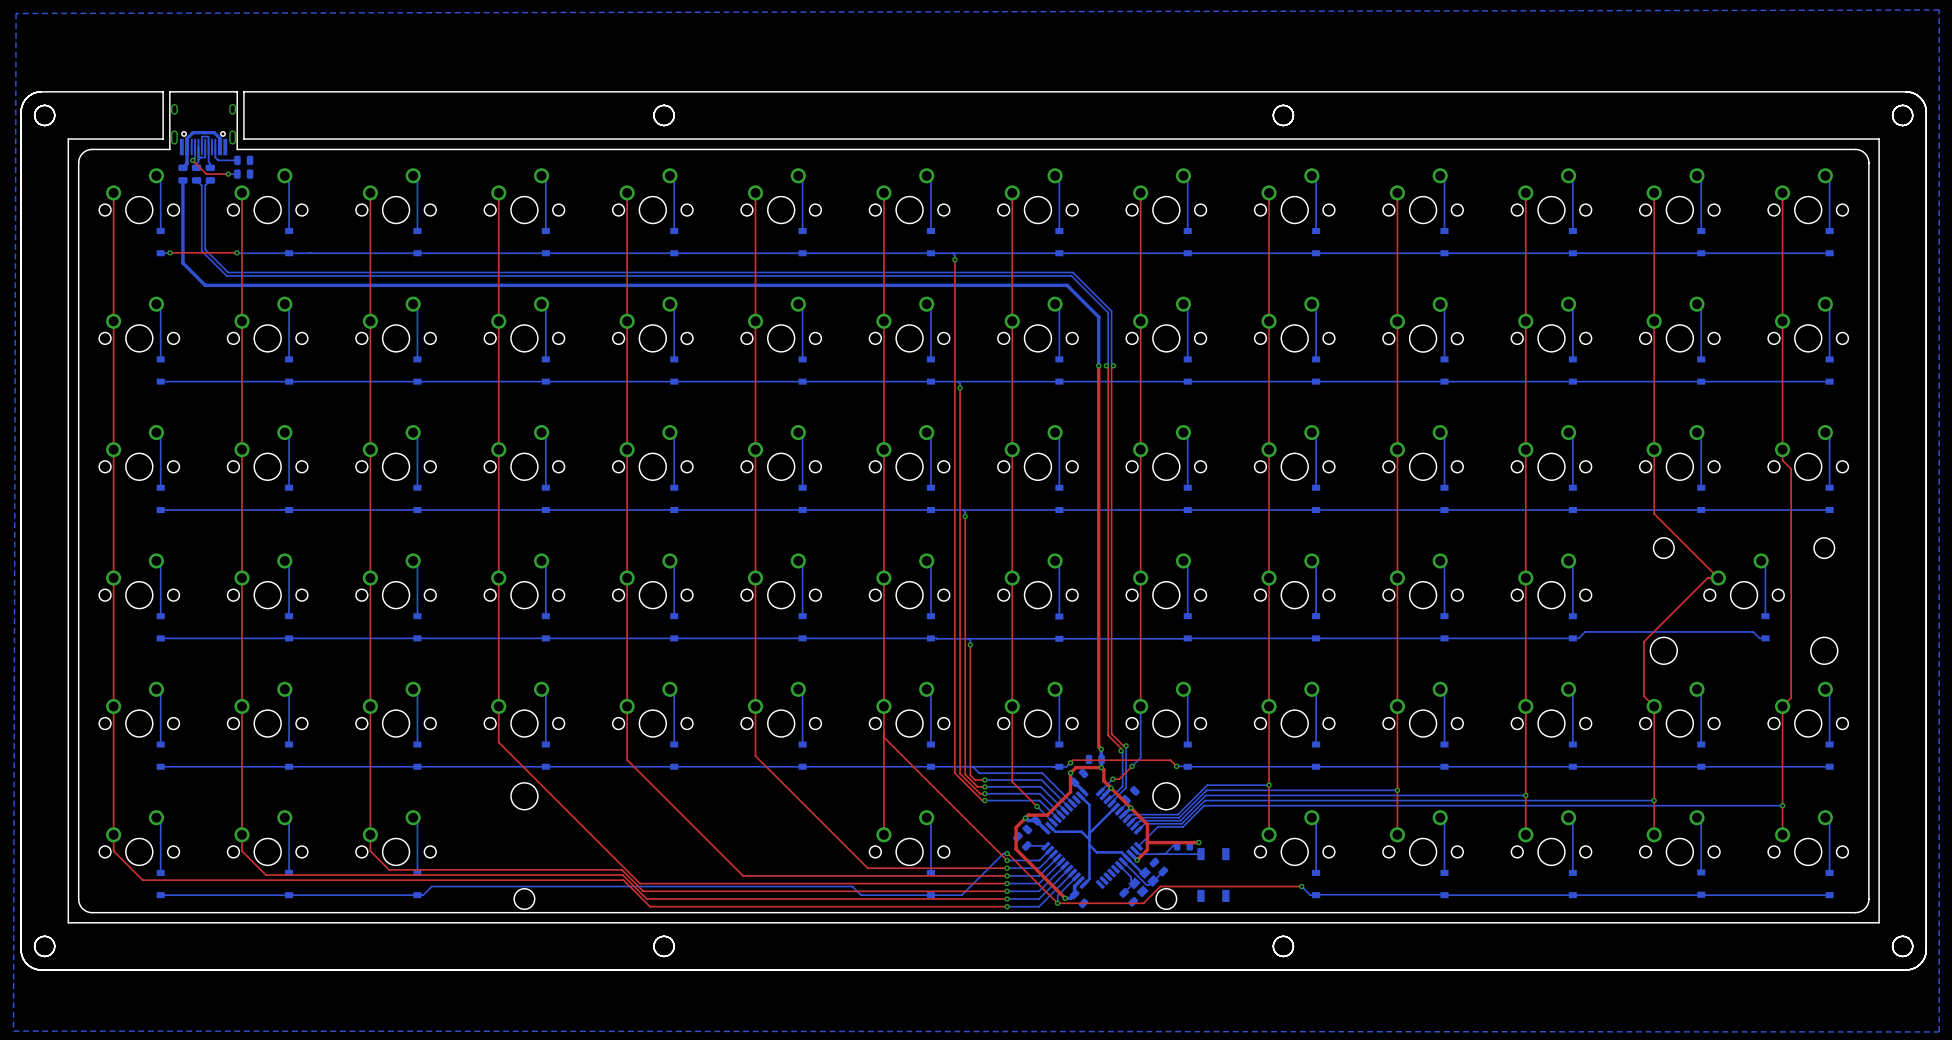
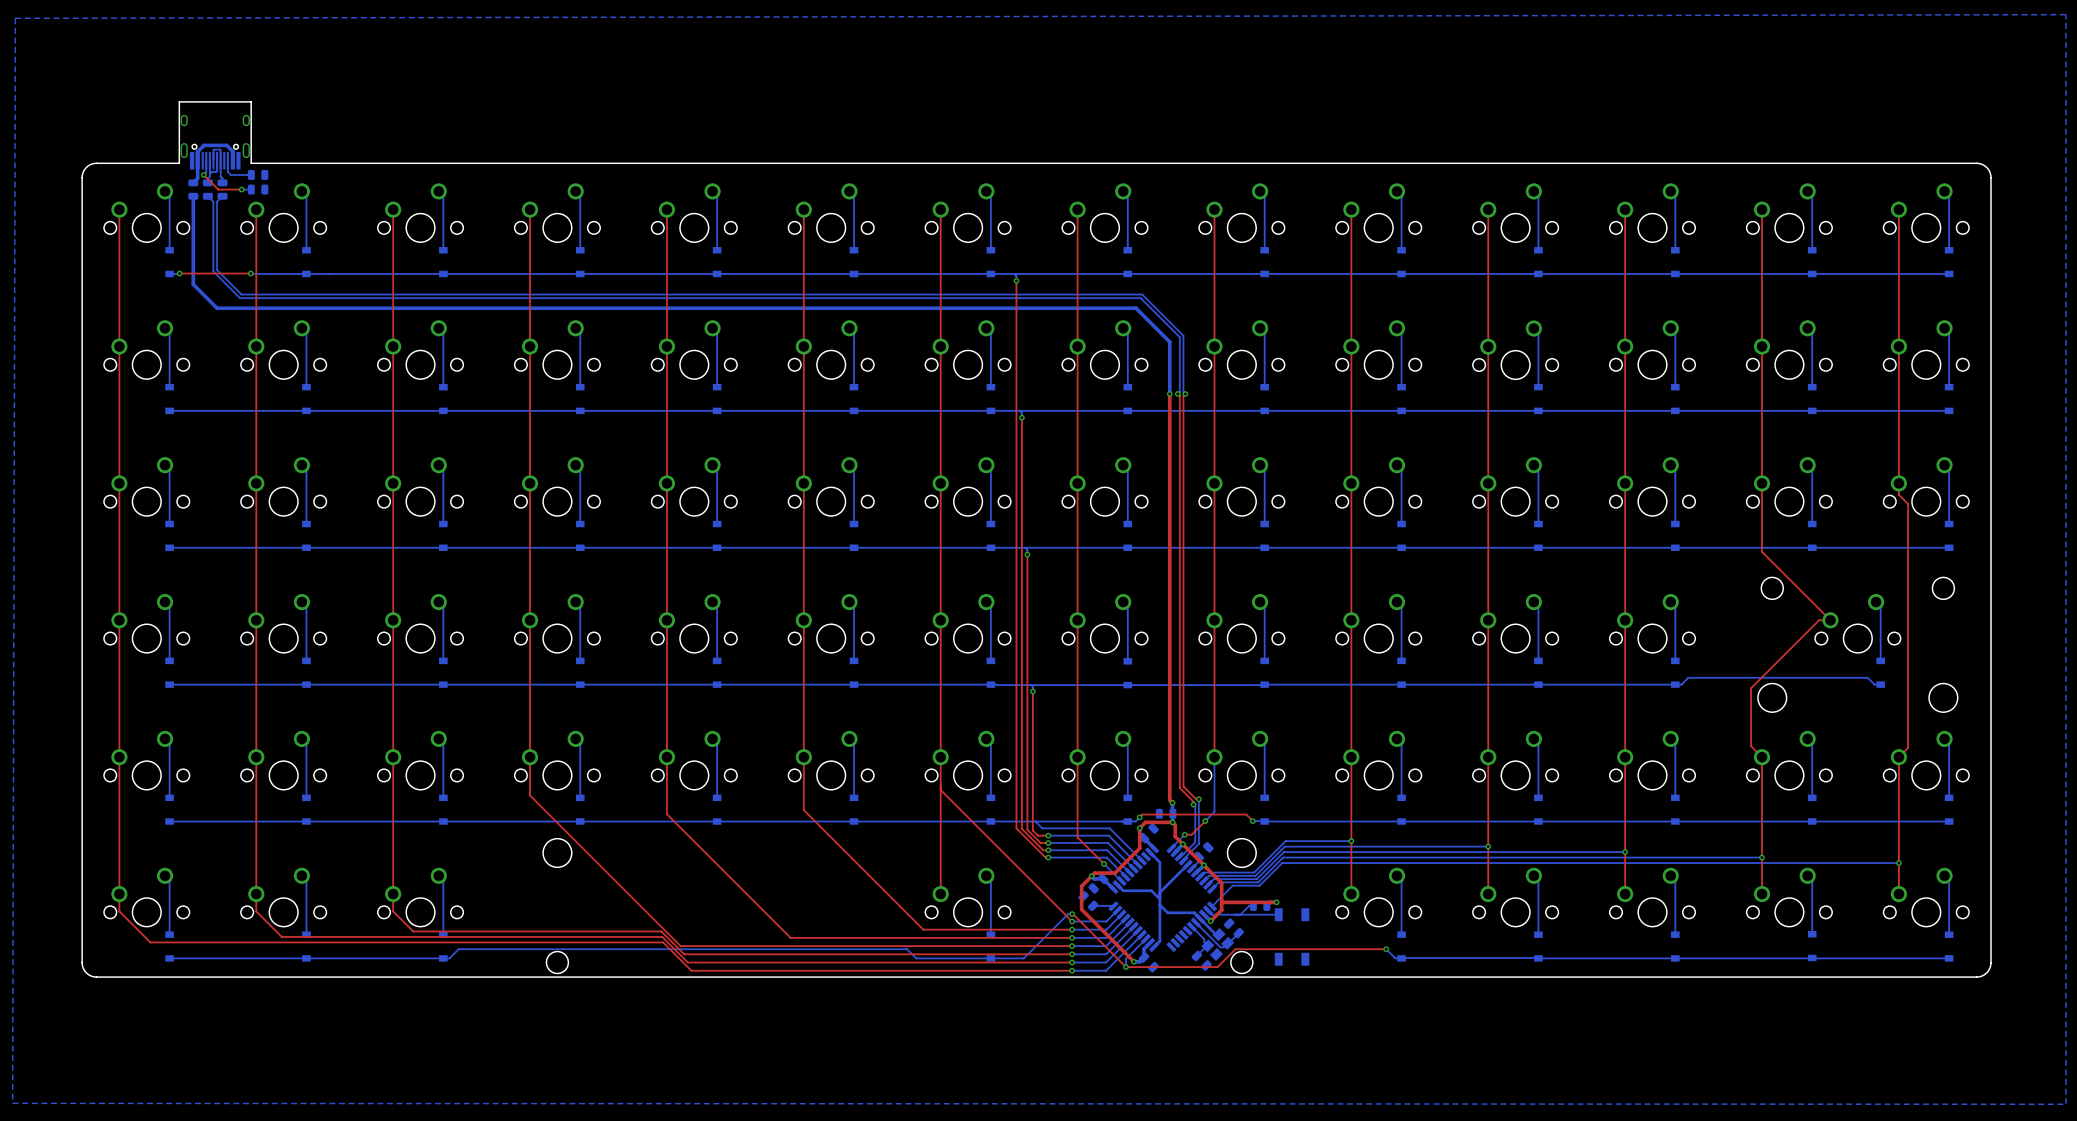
board edge: (41, 91) (163, 91) (163, 139) (68, 139) (68, 922) (1879, 922) (1879, 139) (243, 139) (243, 91) (1906, 91) (1913, 93) (1922, 100) (1926, 112) (1926, 949) (1924, 957) (1917, 966) (1906, 969) (41, 969) (33, 968) (24, 961) (21, 949) (21, 112) (22, 104) (27, 97) (33, 93) (41, 91) -> none
board edge: (44, 105) (36, 109) (34, 115) (36, 121) (44, 125) (52, 121) (54, 115) (50, 107) (44, 105) -> none
board edge: (664, 105) (669, 107) (674, 115) (669, 123) (664, 125) (655, 121) (653, 115) (658, 107) (664, 105) -> none
board edge: (1283, 105) (1277, 107) (1273, 115) (1277, 123) (1283, 125) (1291, 121) (1293, 115) (1289, 107) (1283, 105) -> none
board edge: (1902, 105) (1896, 107) (1892, 115) (1896, 123) (1902, 125) (1910, 121) (1912, 115) (1910, 109) (1902, 105) -> none
board edge: (44, 936) (38, 938) (34, 946) (36, 952) (44, 956) (50, 954) (54, 946) (50, 938) (44, 936) -> none
board edge: (664, 936) (669, 938) (674, 946) (669, 954) (664, 956) (658, 954) (653, 946) (658, 938) (664, 936) -> none
board edge: (1283, 936) (1277, 938) (1273, 946) (1277, 954) (1283, 956) (1289, 954) (1293, 946) (1289, 938) (1283, 936) -> none
board edge: (1902, 936) (1896, 938) (1892, 946) (1896, 954) (1902, 956) (1908, 954) (1912, 946) (1908, 938) (1902, 936) -> none

